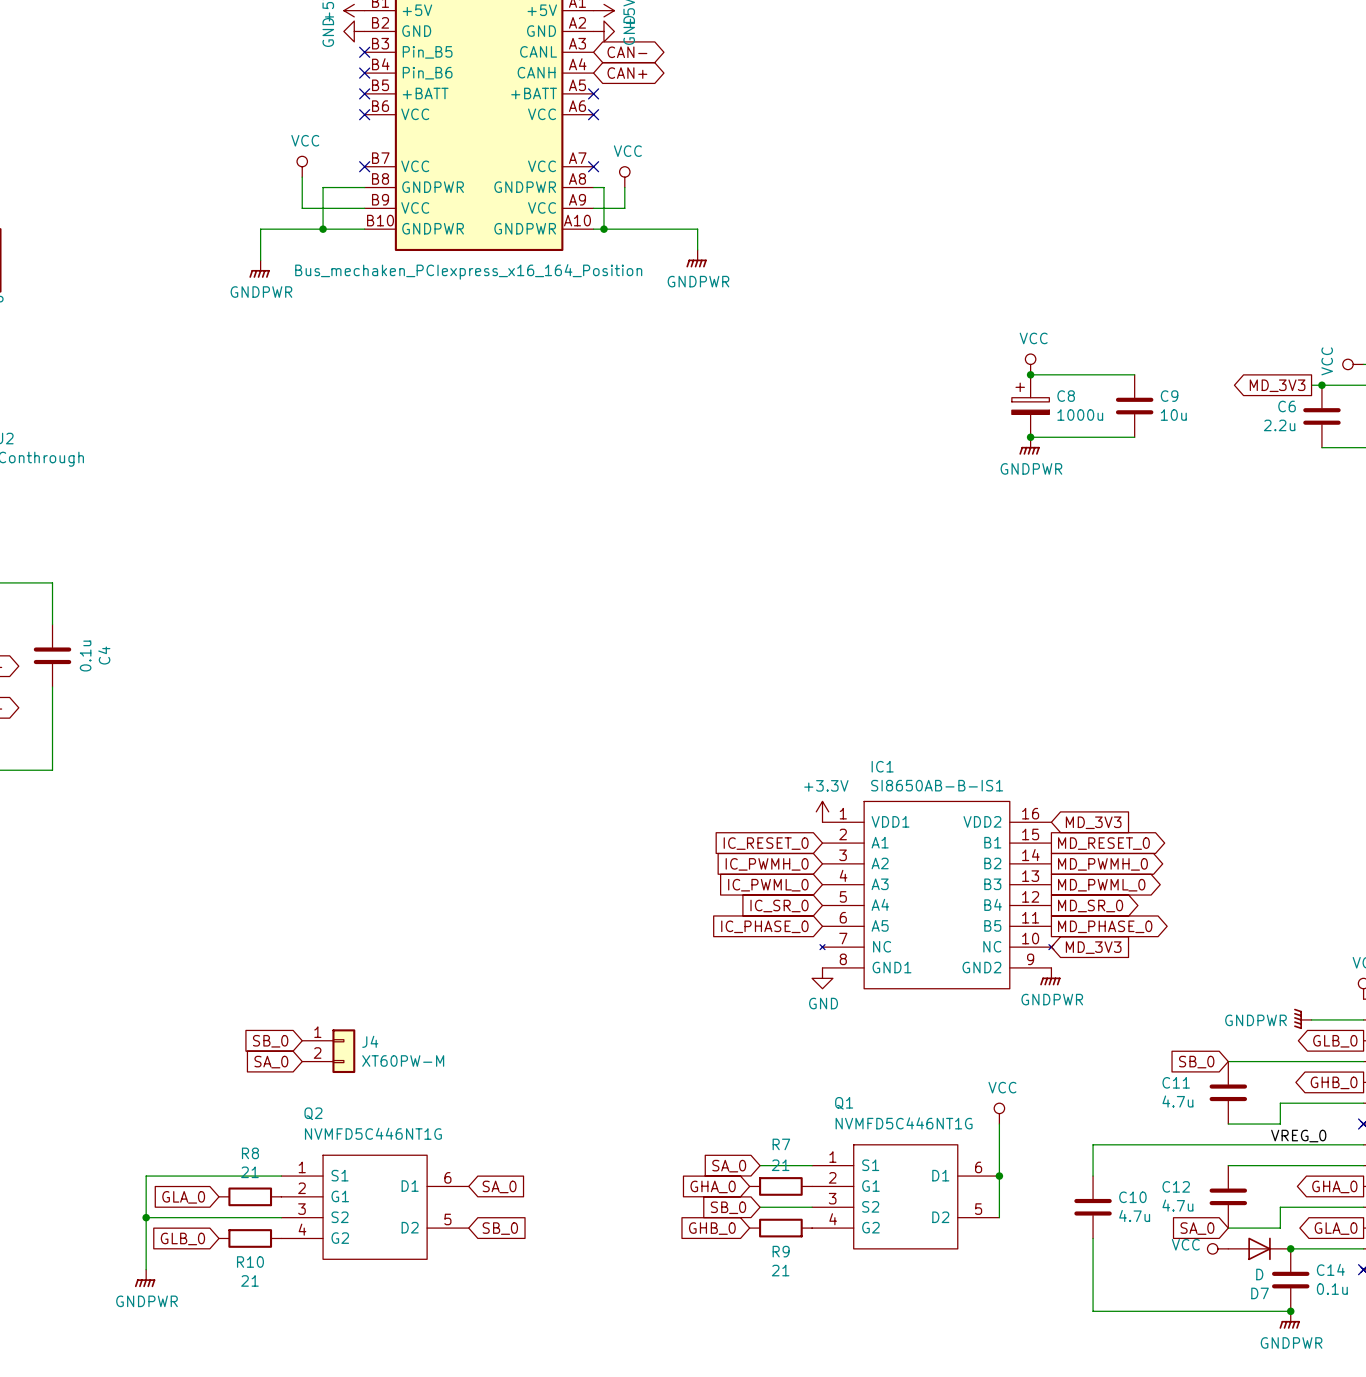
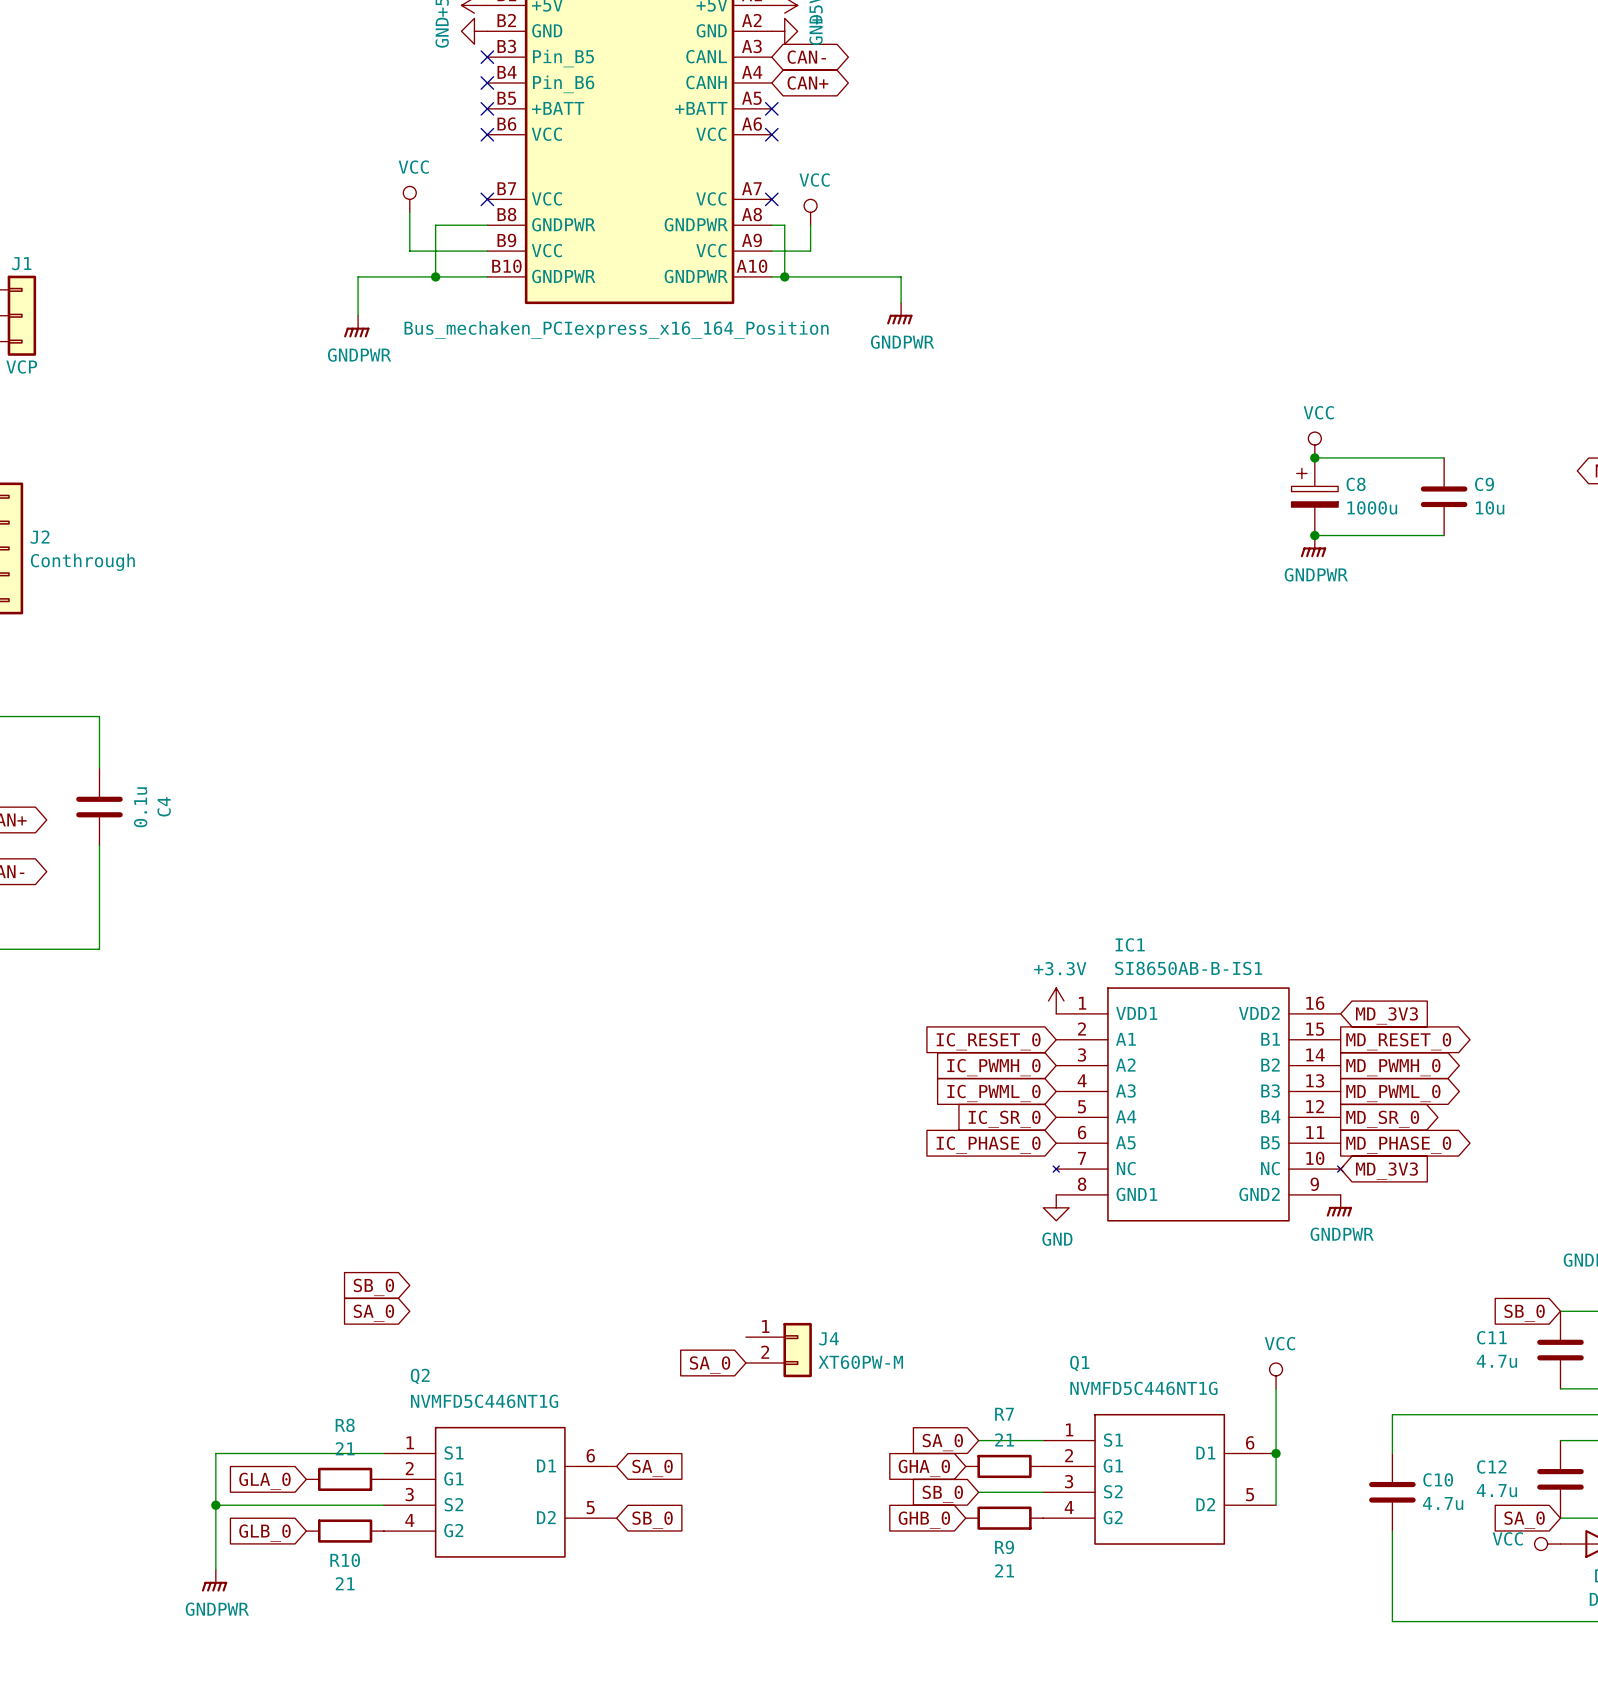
J4 position: (328, 1051) -> (778, 1350)
global label: none -> SA_0 (710, 1364)

